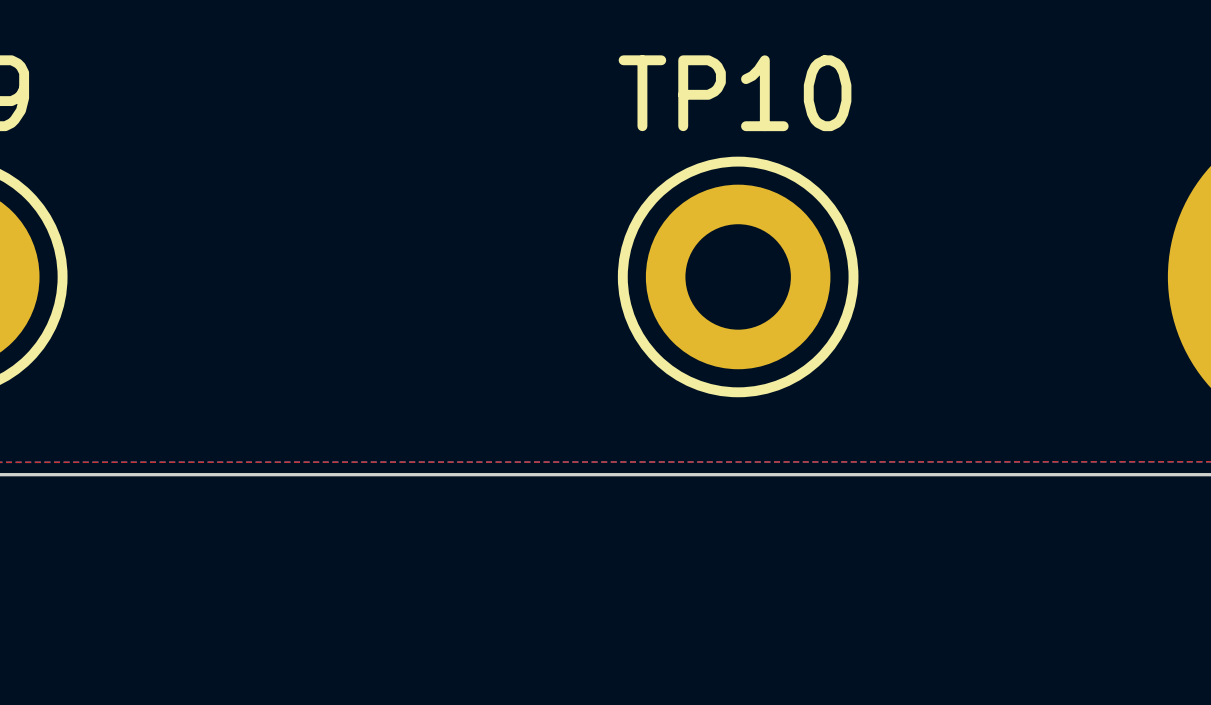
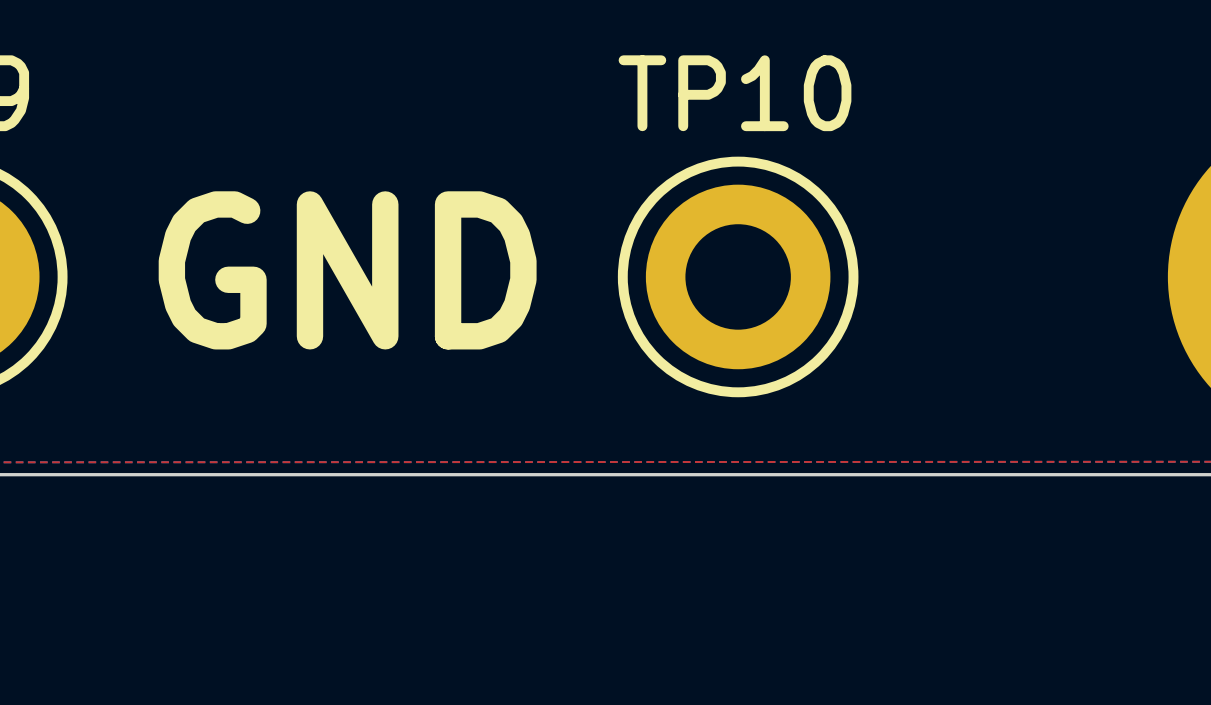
text: none -> GND (347, 270)

